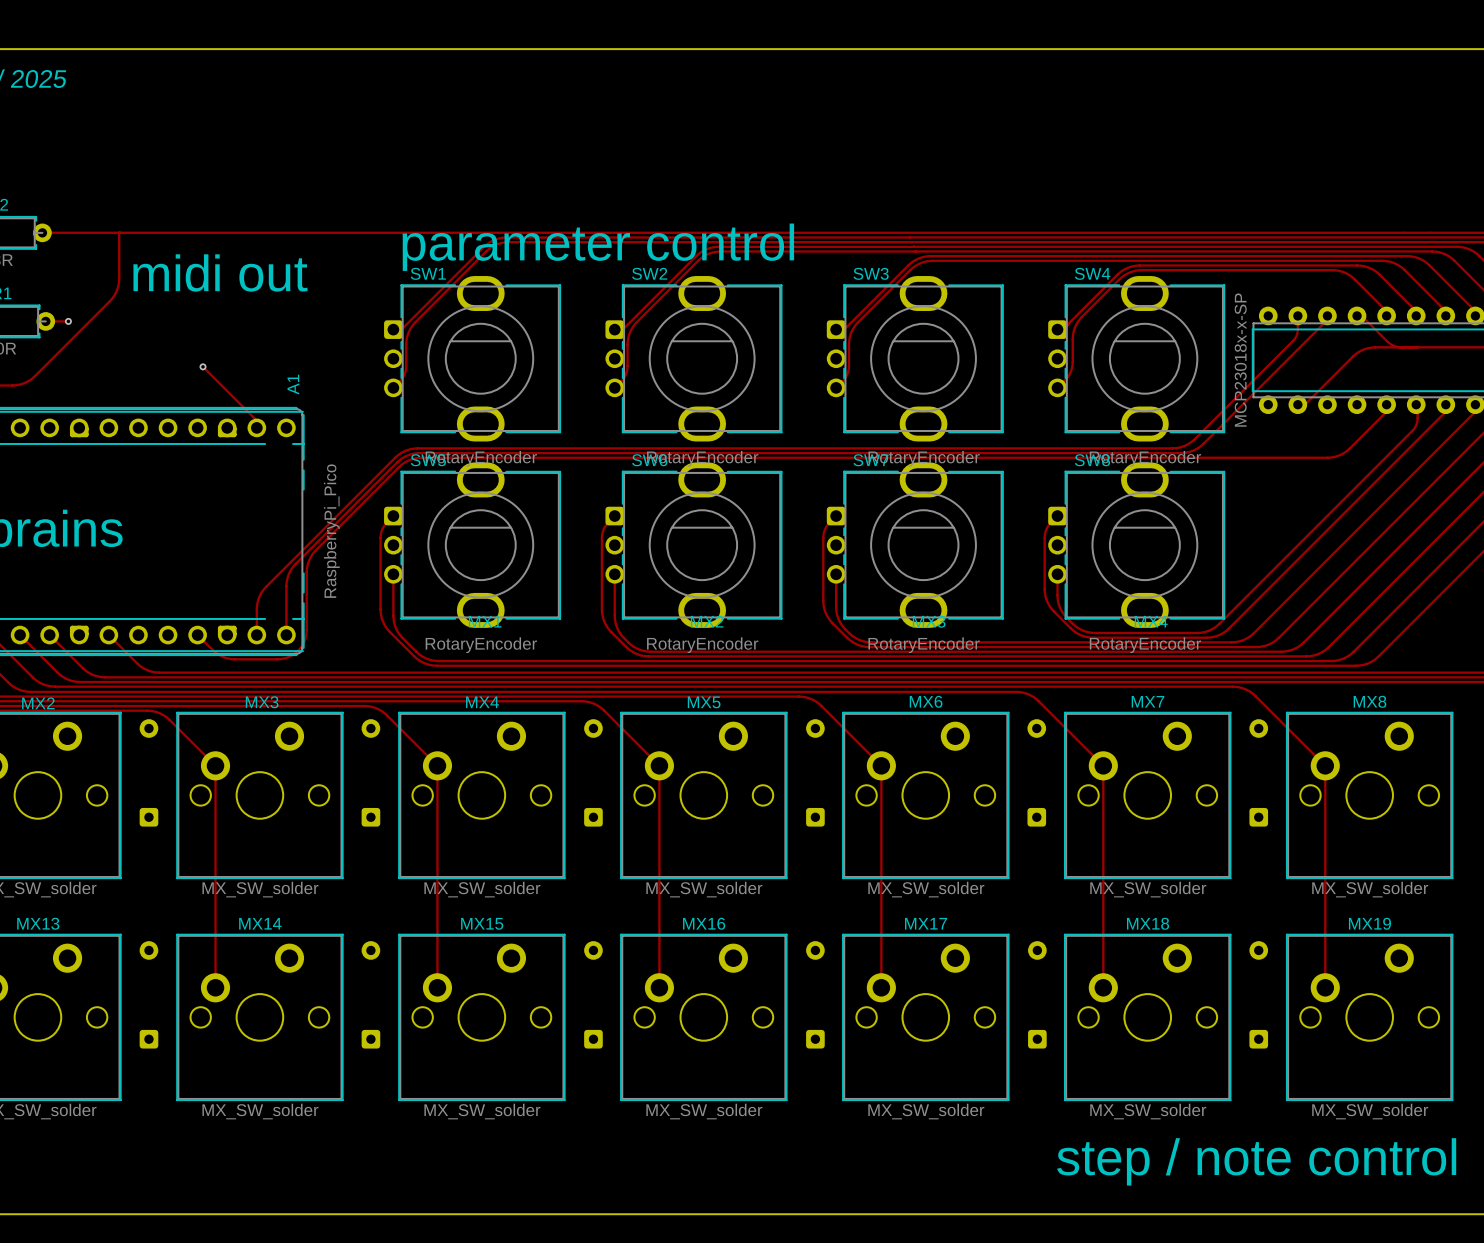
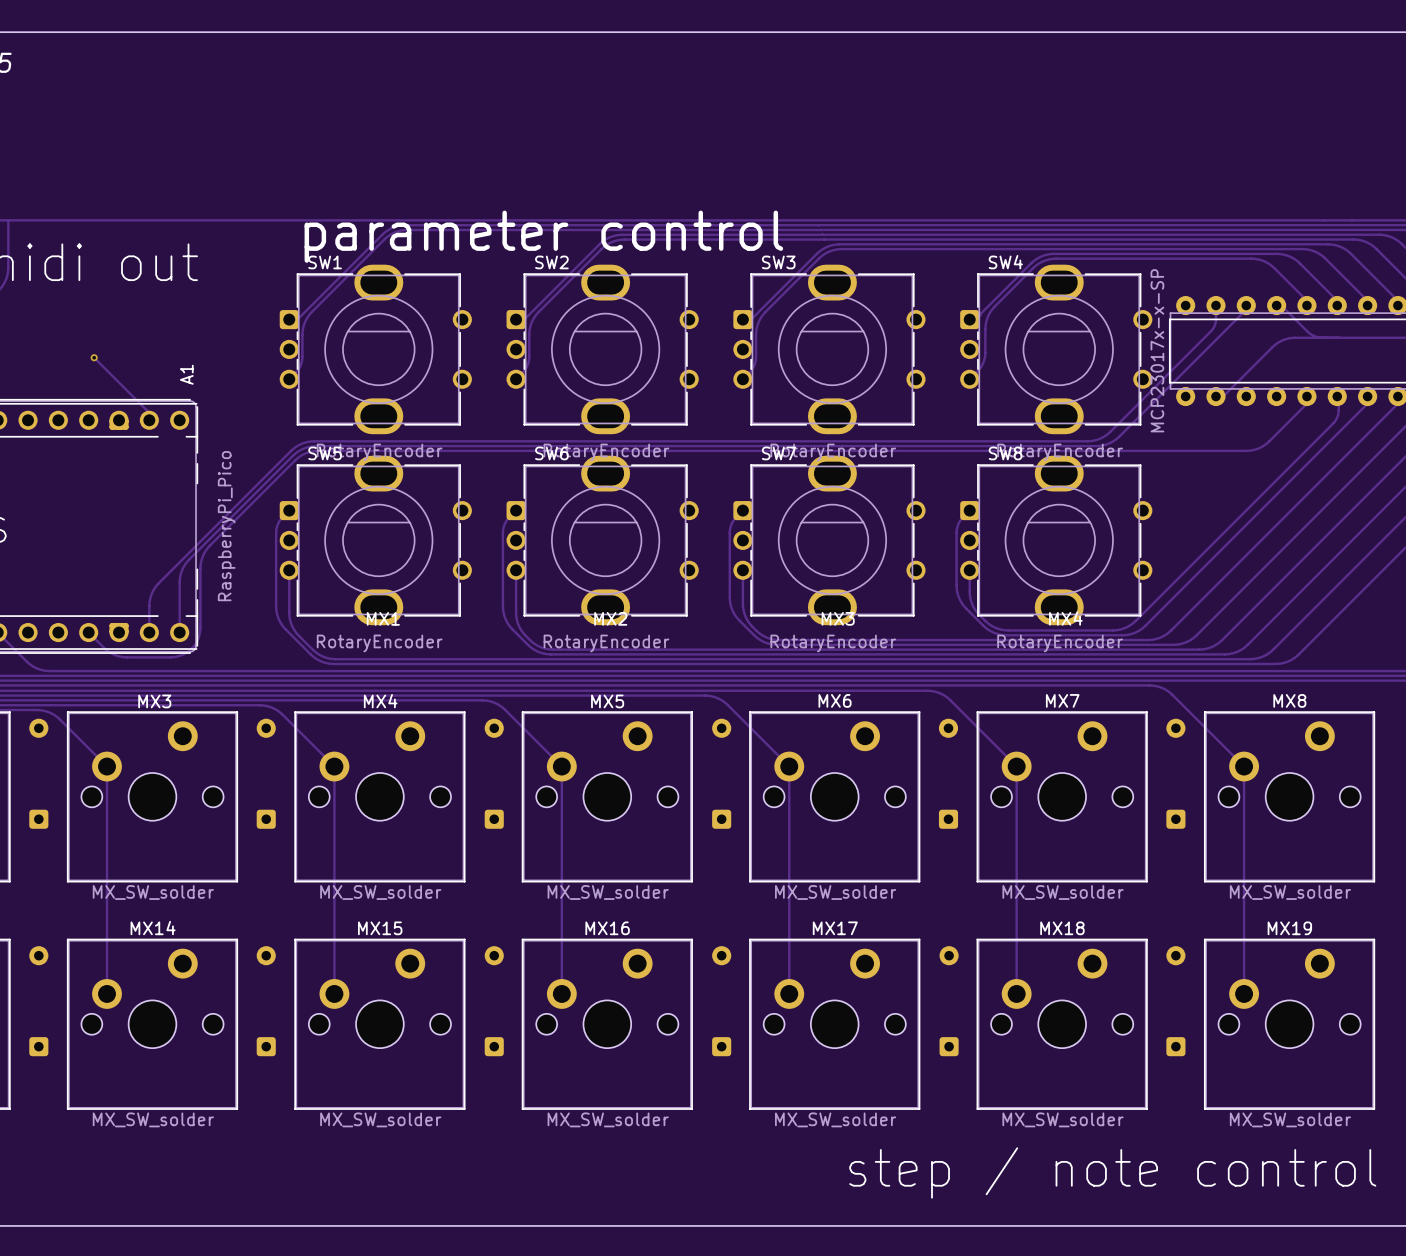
SW1 footprint: [384, 276, 561, 442] -> [279, 264, 472, 435]
SW2 footprint: [605, 276, 783, 442] -> [506, 264, 699, 435]
SW3 footprint: [826, 276, 1004, 442] -> [733, 264, 926, 435]
SW4 footprint: [1048, 276, 1225, 442] -> [960, 264, 1153, 435]
part value: MCP23018x-x-SP (1240, 360) -> MCP23017x-x-SP (1157, 350)
SW5 footprint: [384, 462, 561, 628] -> [279, 455, 472, 626]
SW6 footprint: [605, 462, 783, 628] -> [506, 455, 699, 626]
SW7 footprint: [826, 462, 1004, 628] -> [733, 455, 926, 626]
SW8 footprint: [1048, 462, 1225, 628] -> [960, 455, 1153, 626]

